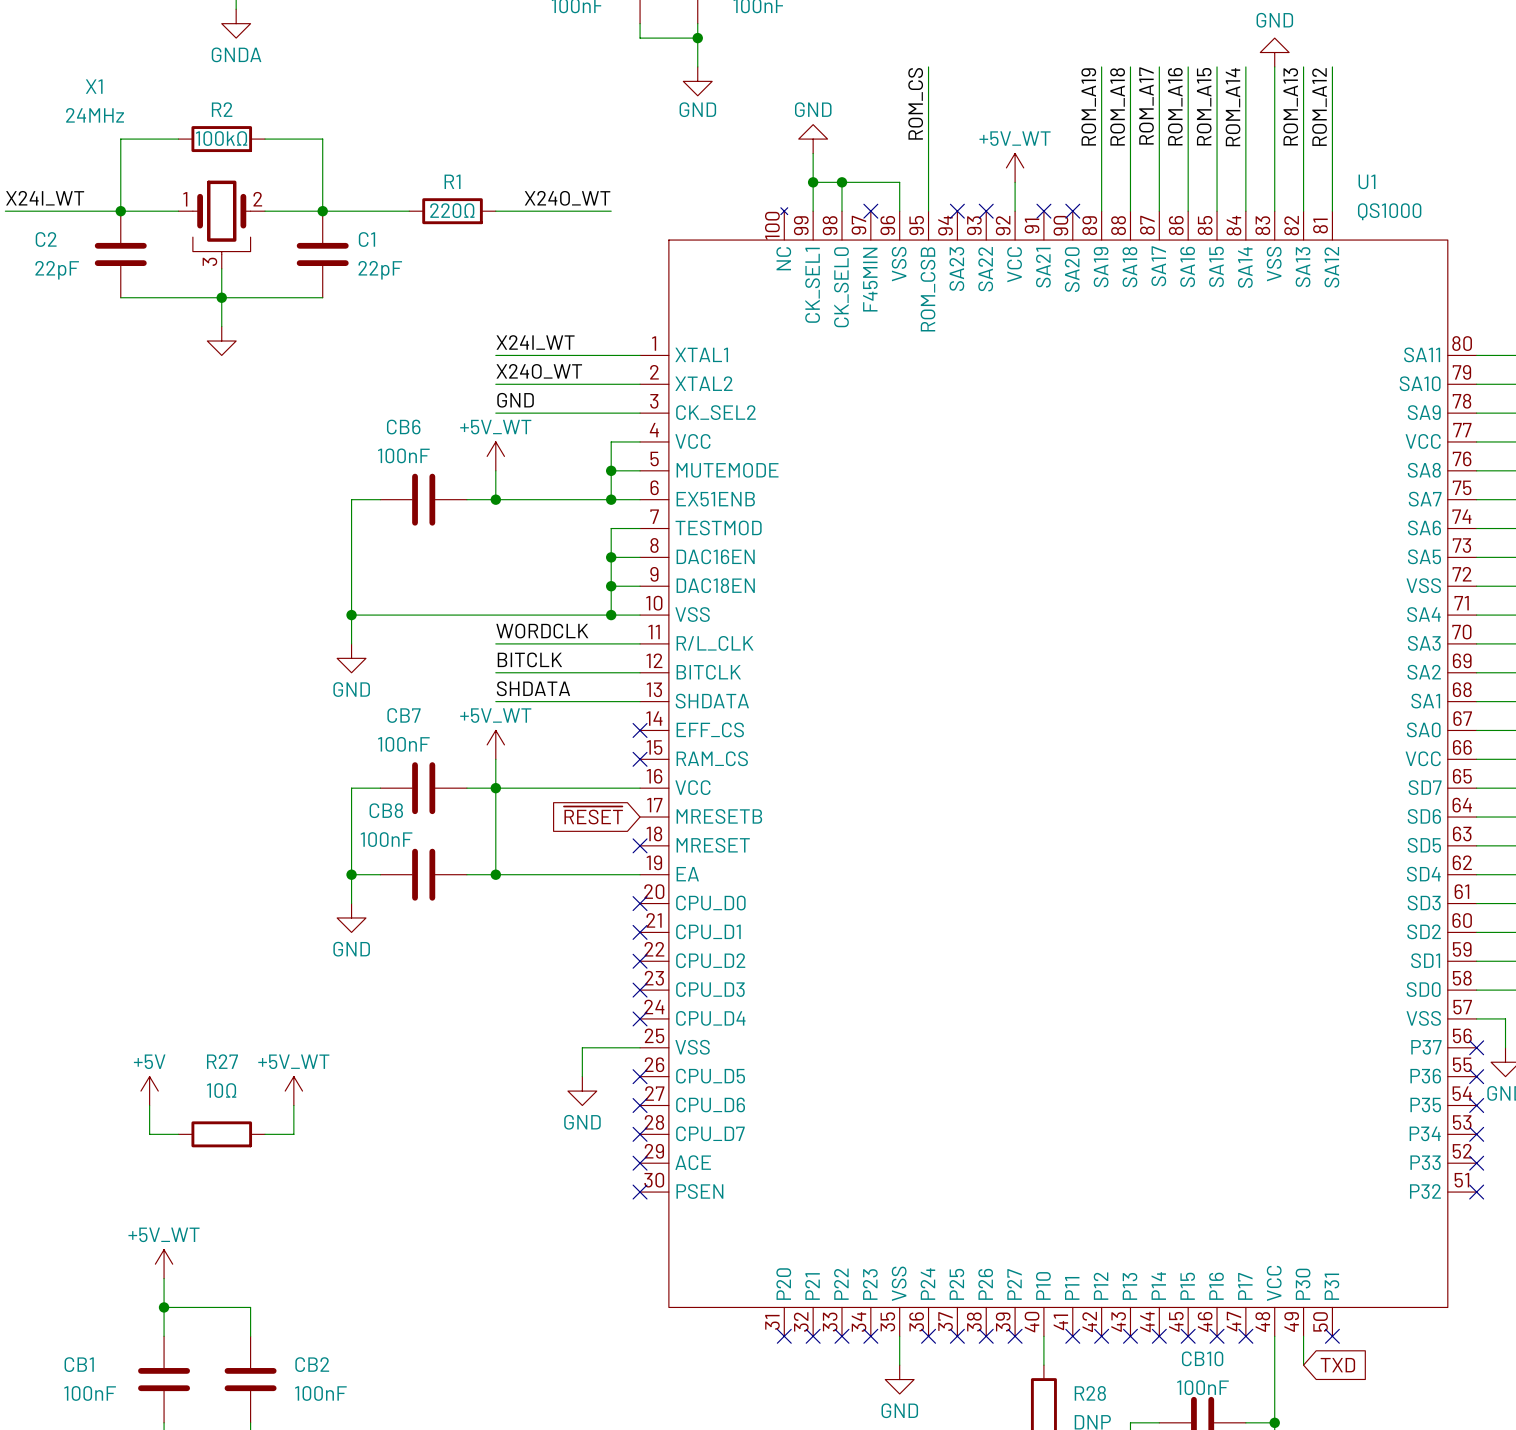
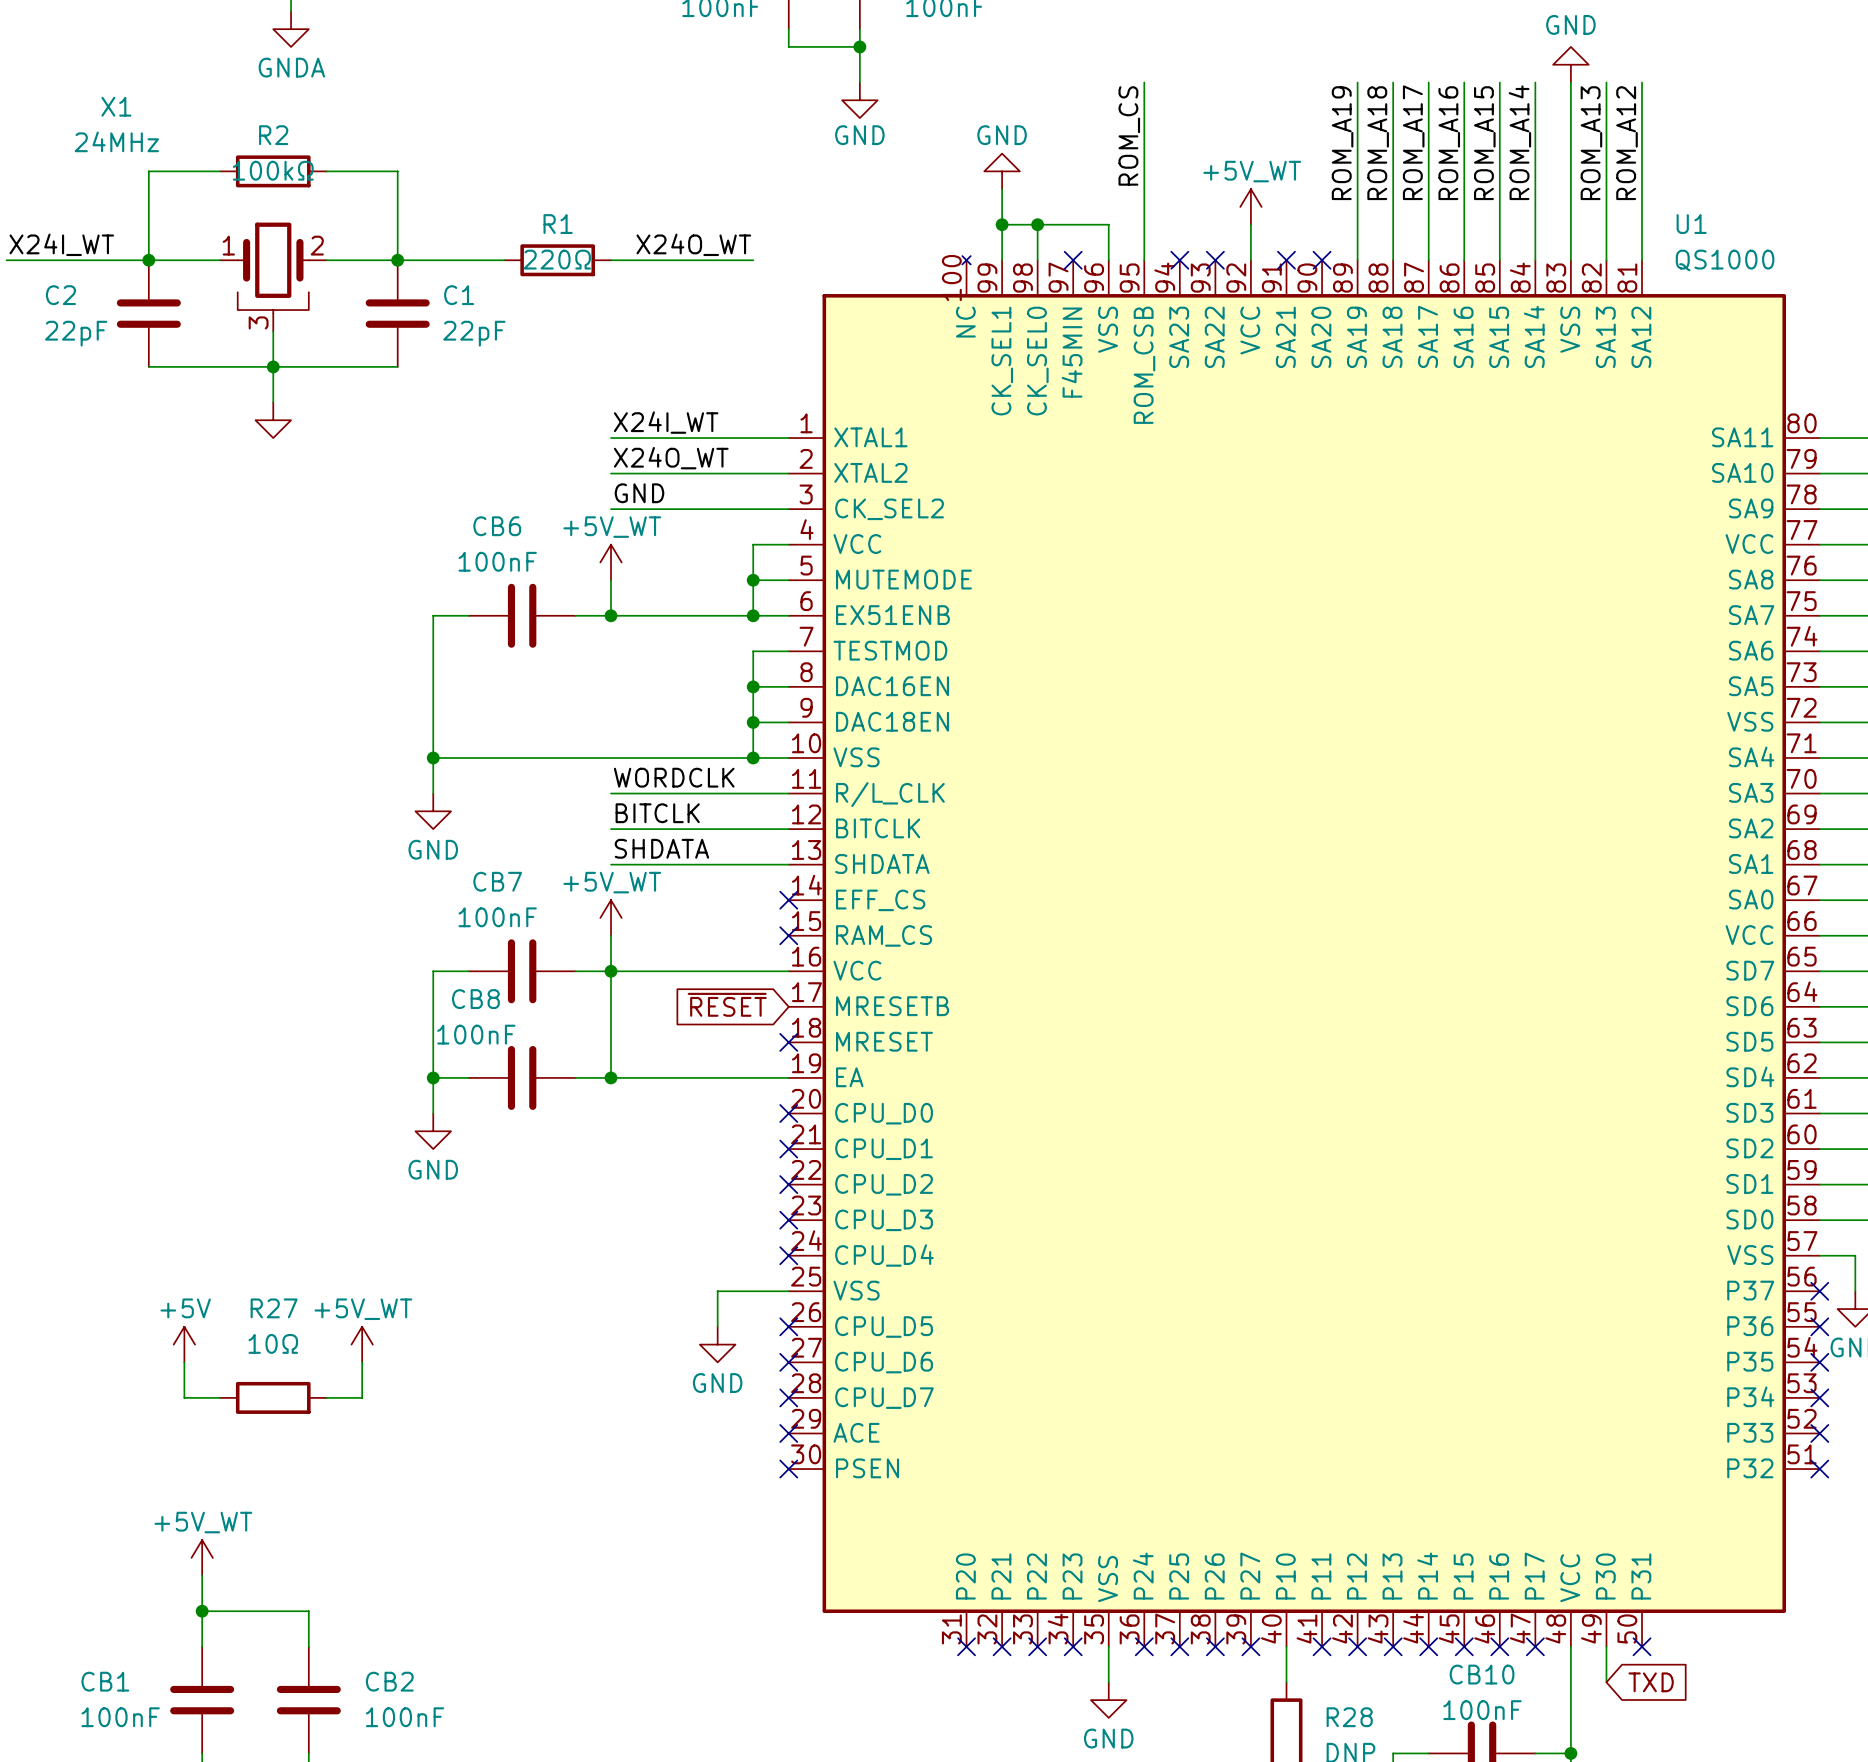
U1 symbol: [640, 207, 1477, 1337] -> [788, 256, 1820, 1647]

